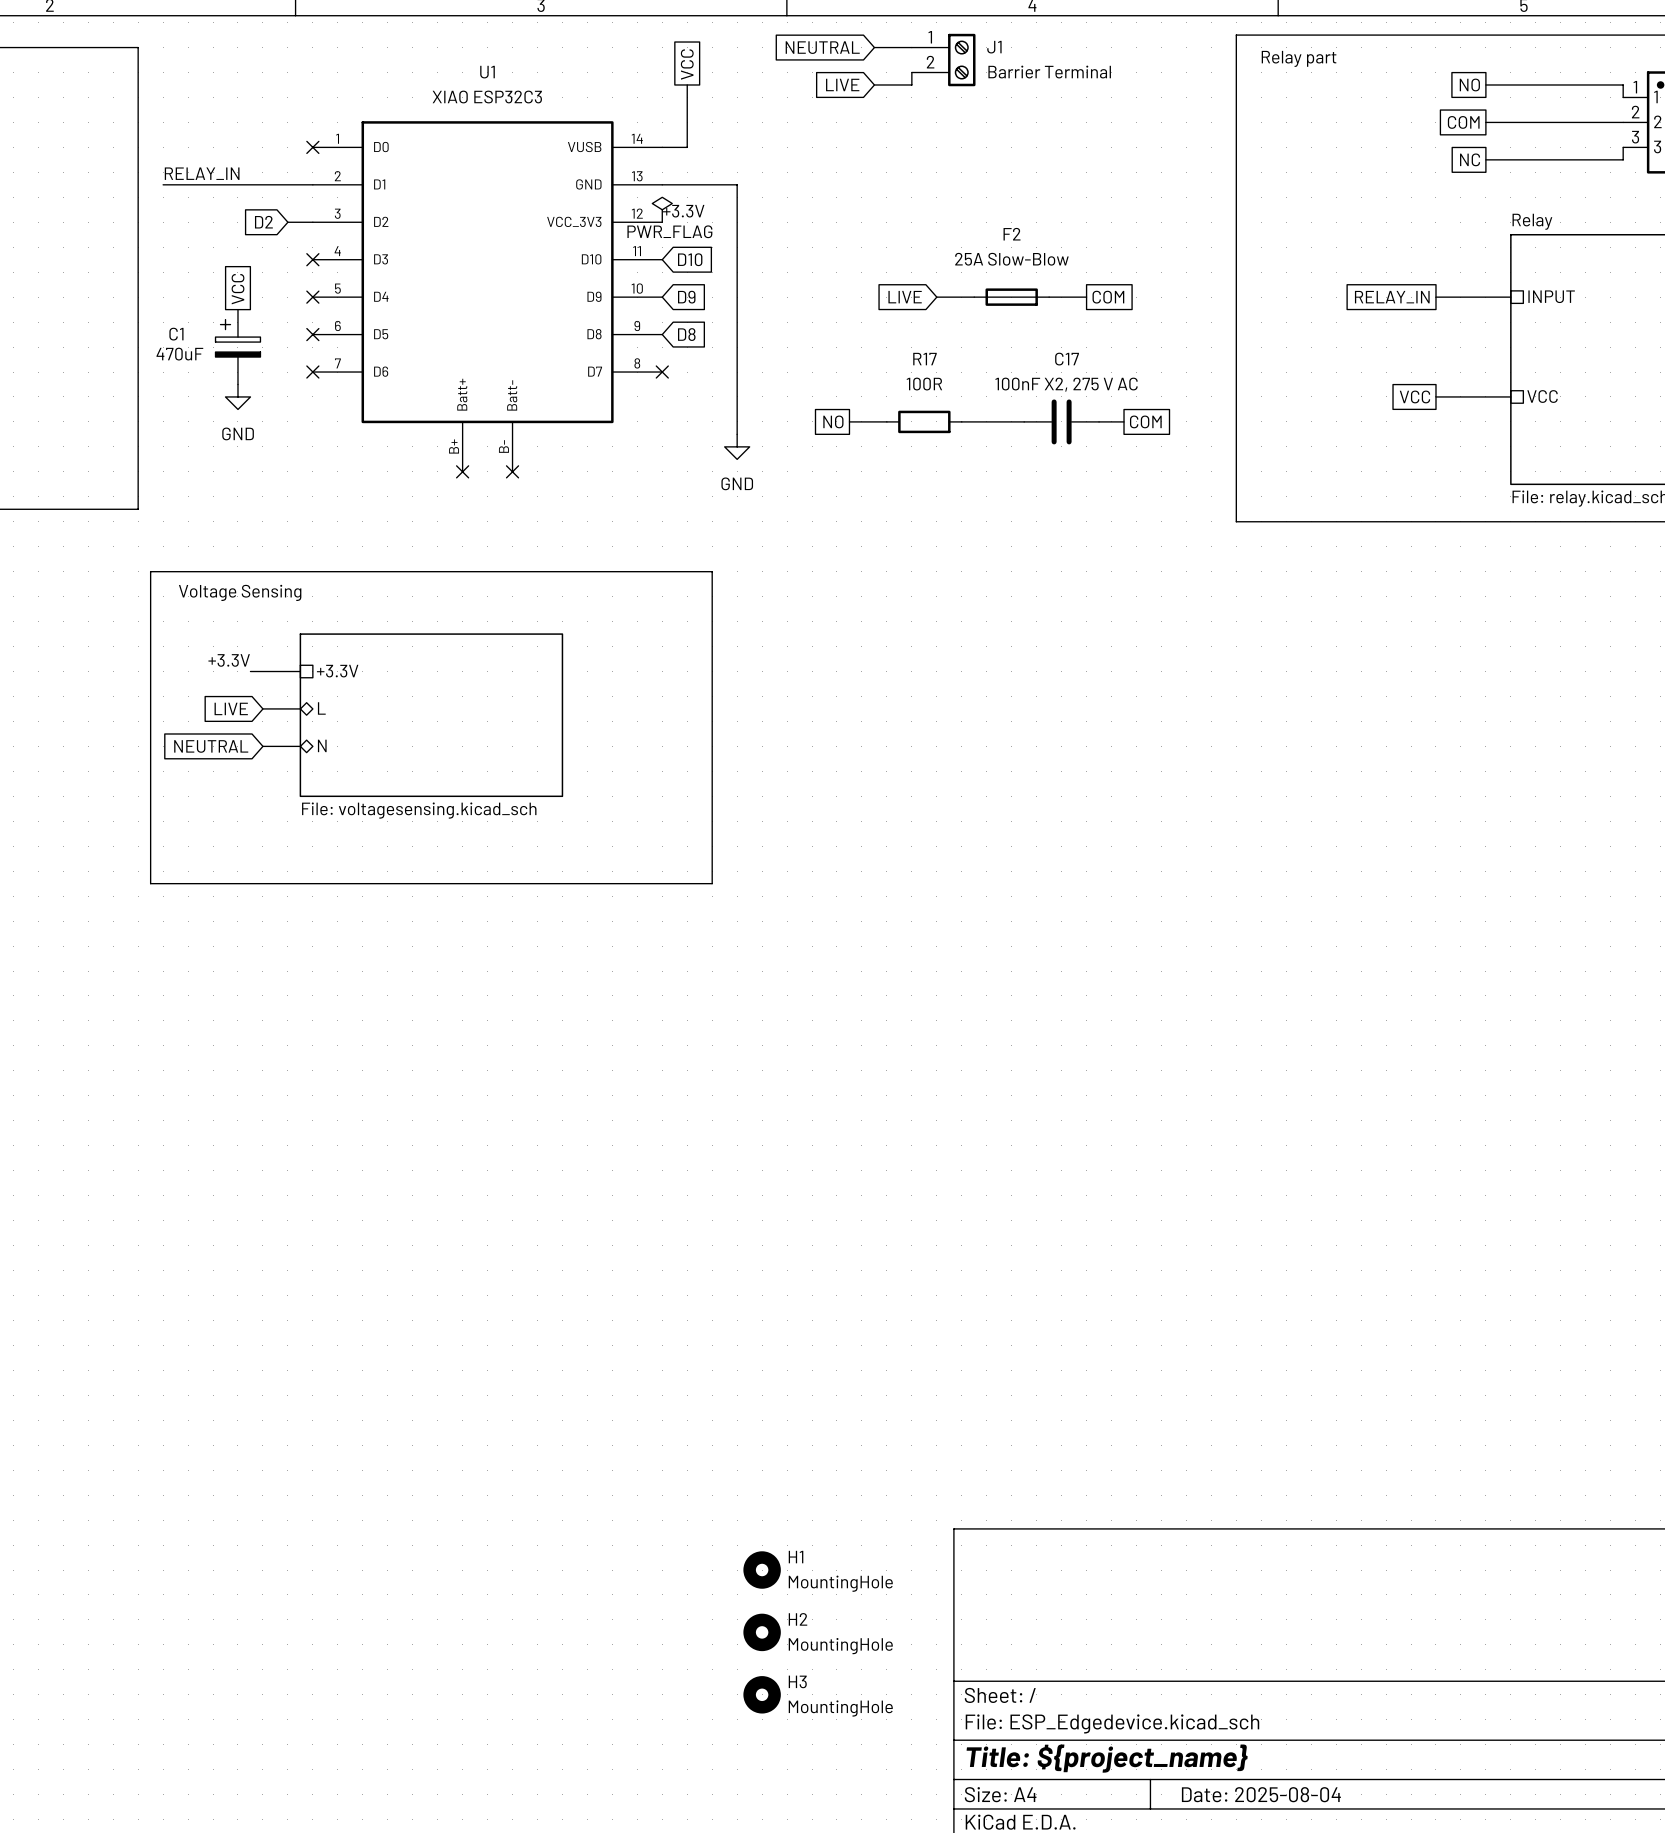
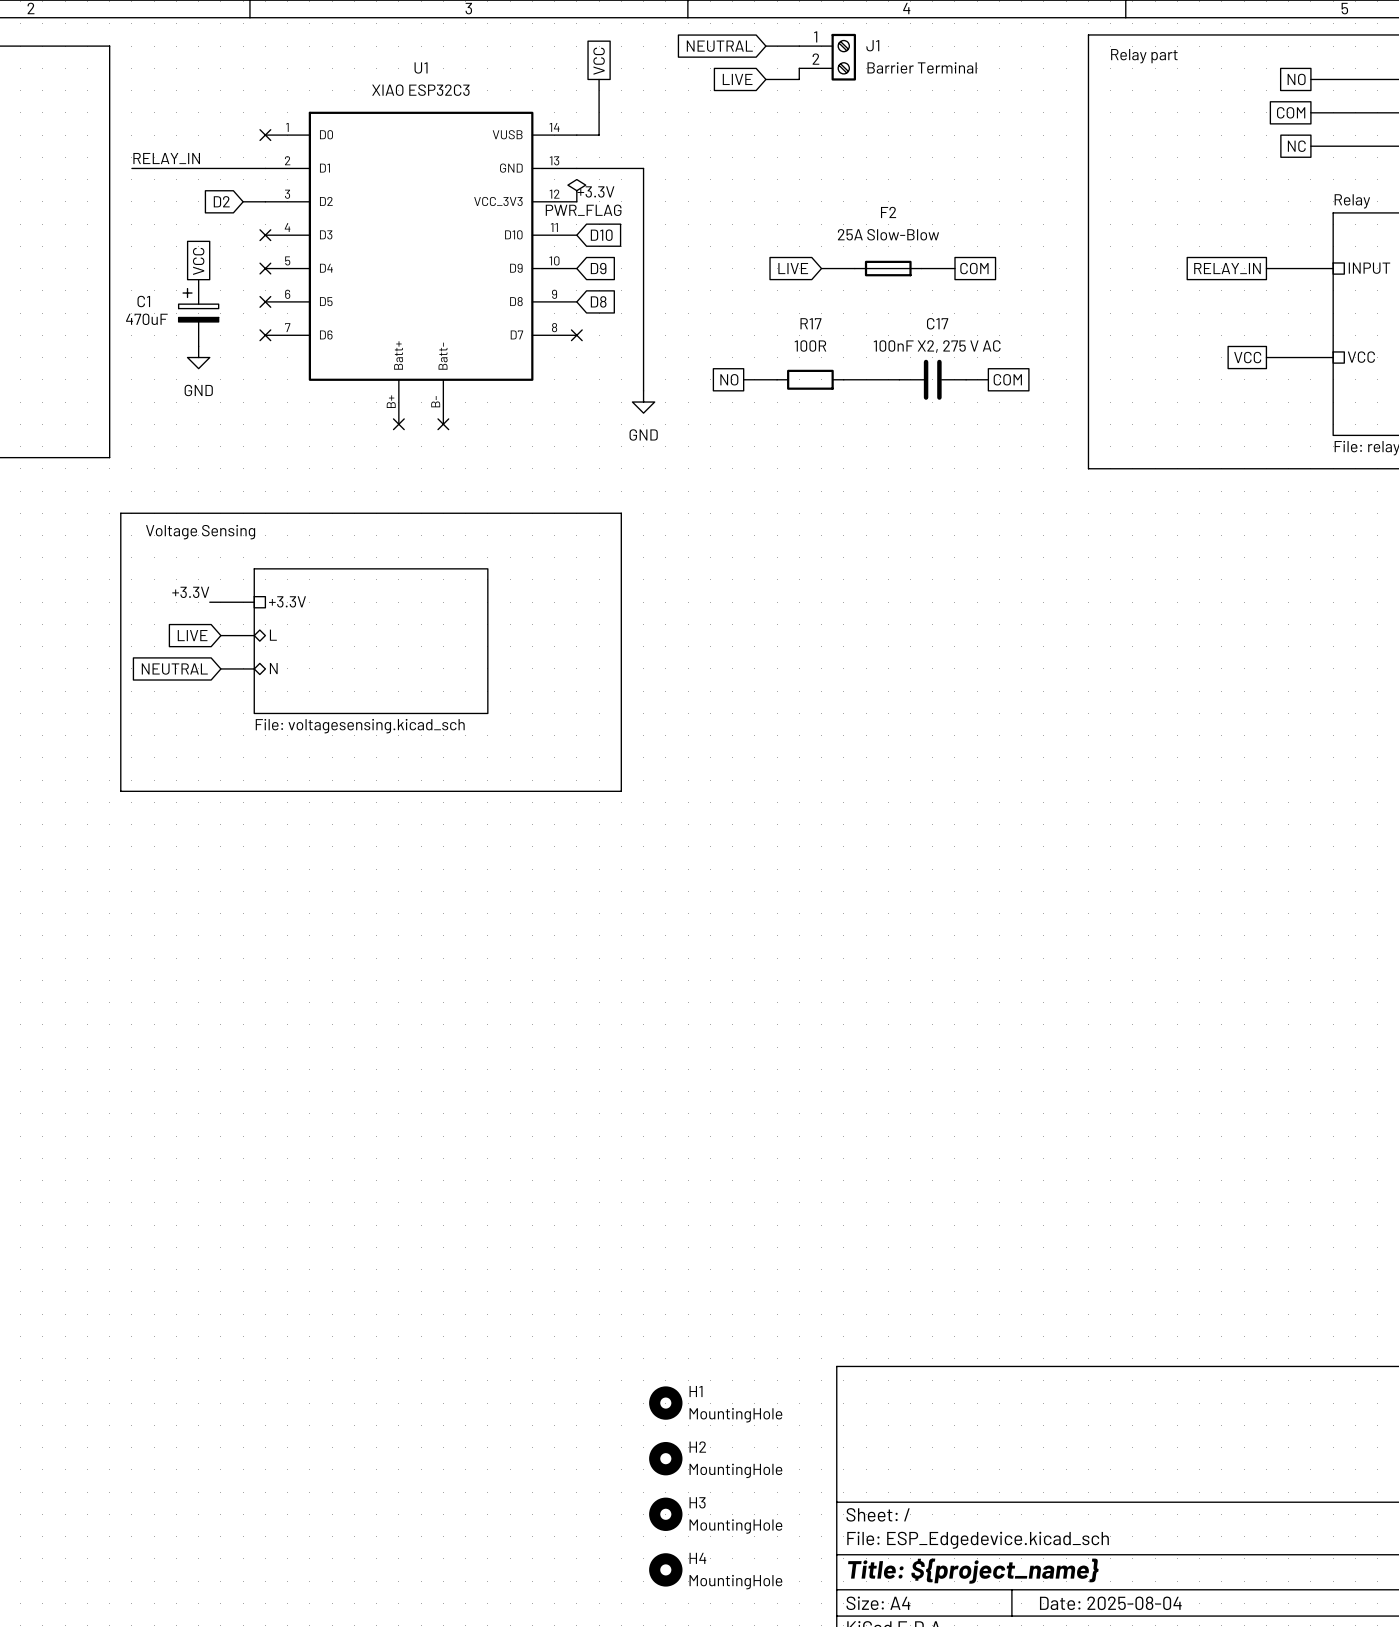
H4: none -> MountingHole (665, 1569)

